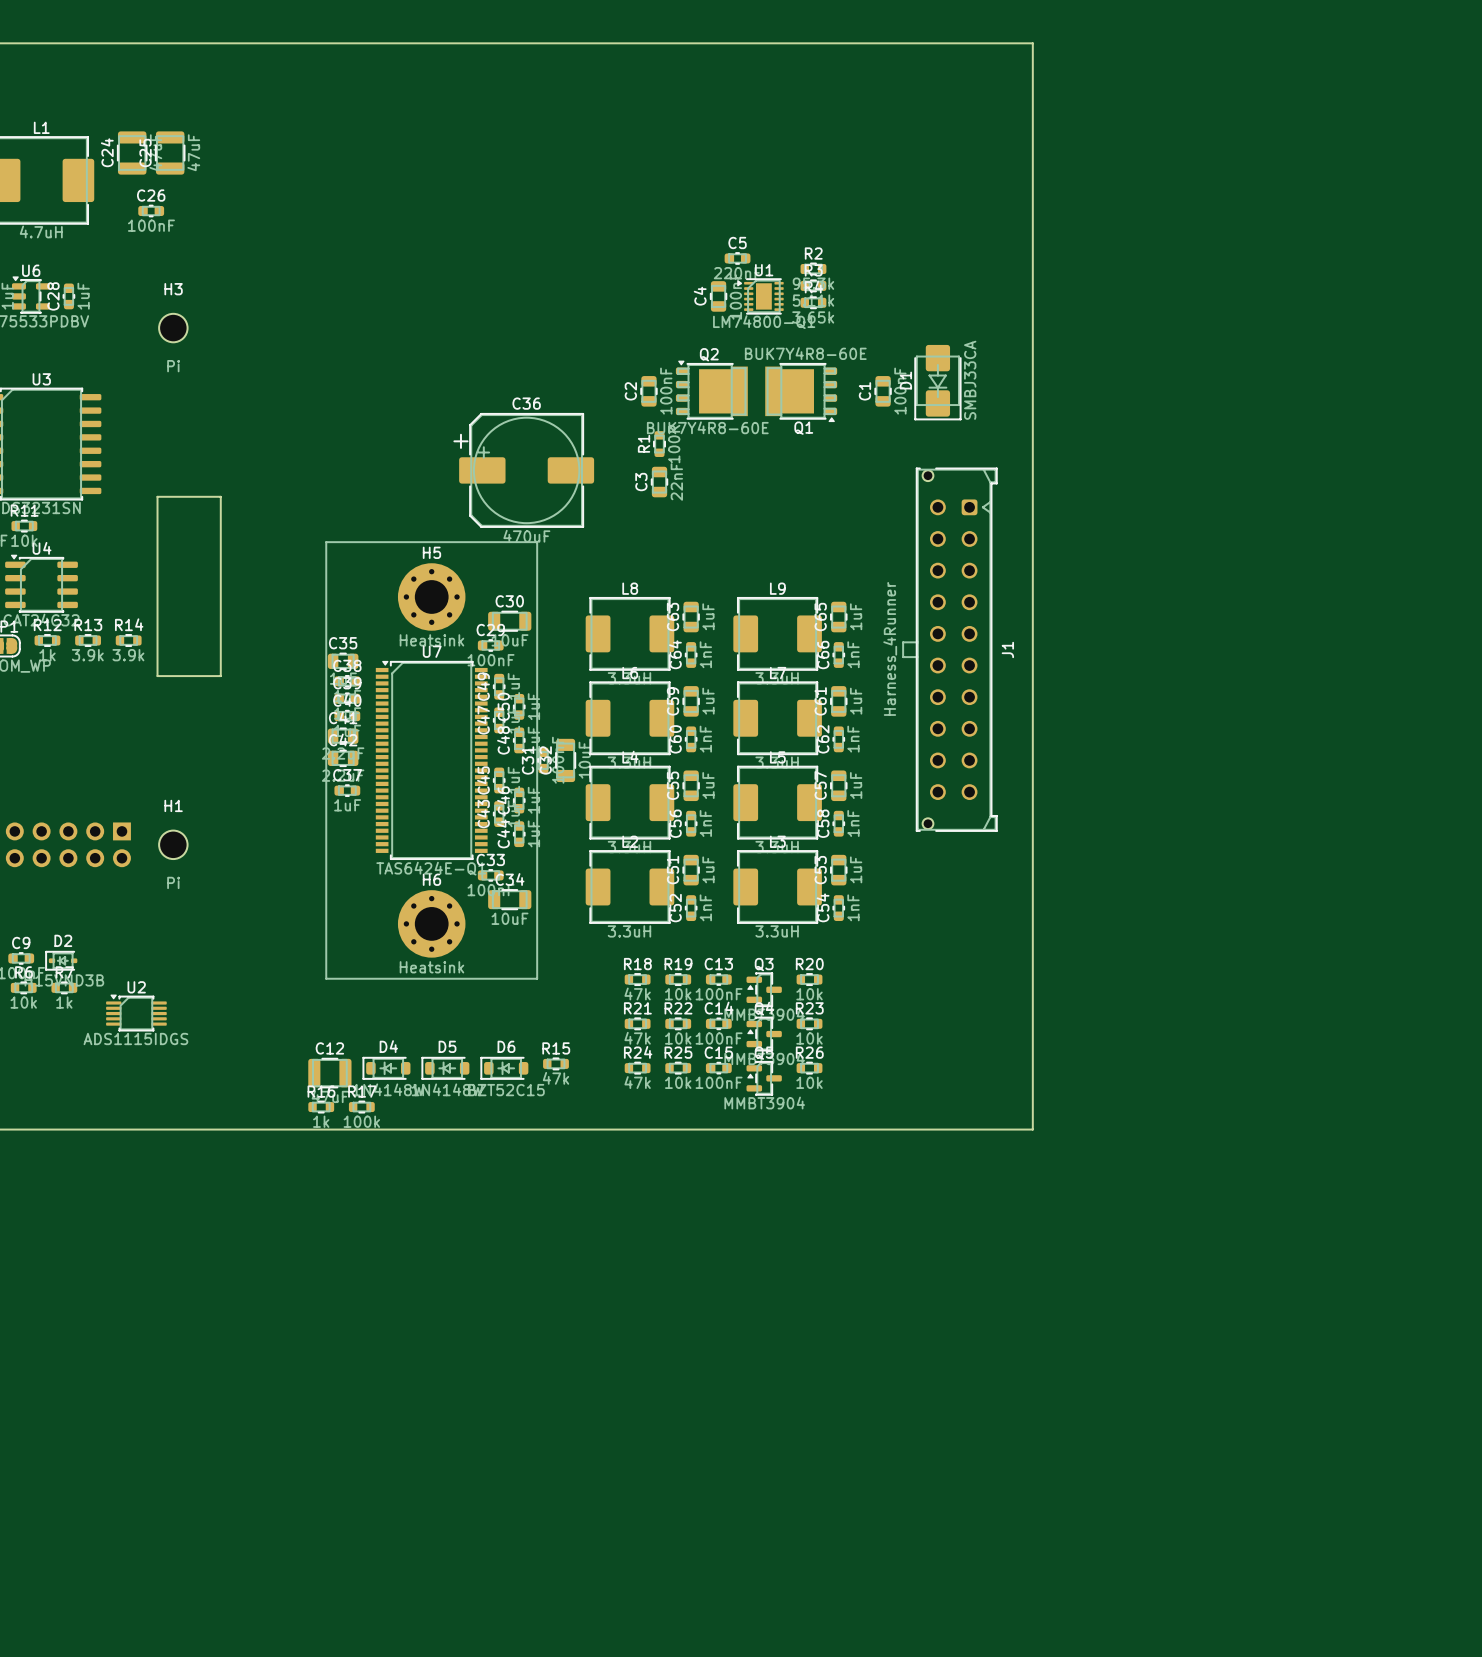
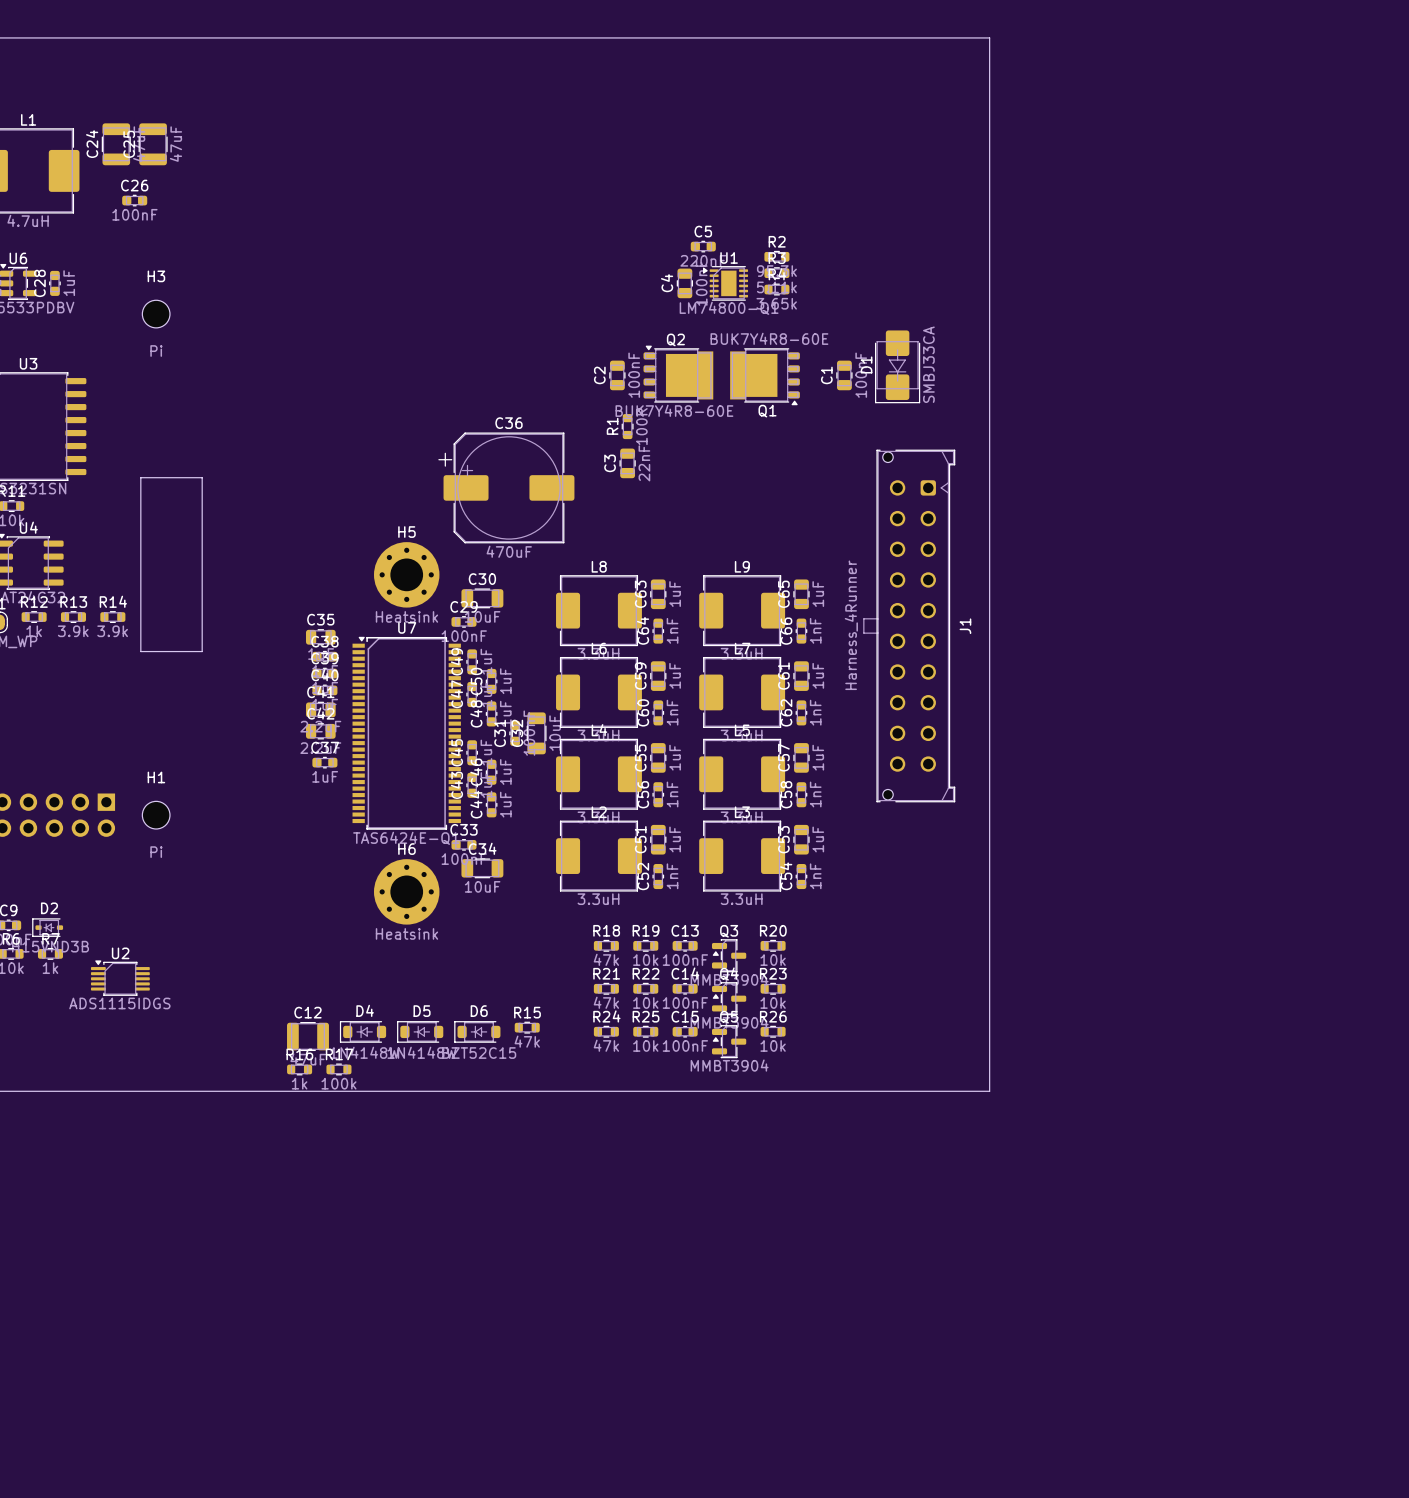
C36 position: (523, 470) -> (506, 487)
line: (326, 542) (537, 542) (537, 978) (326, 978) (326, 542) -> none

